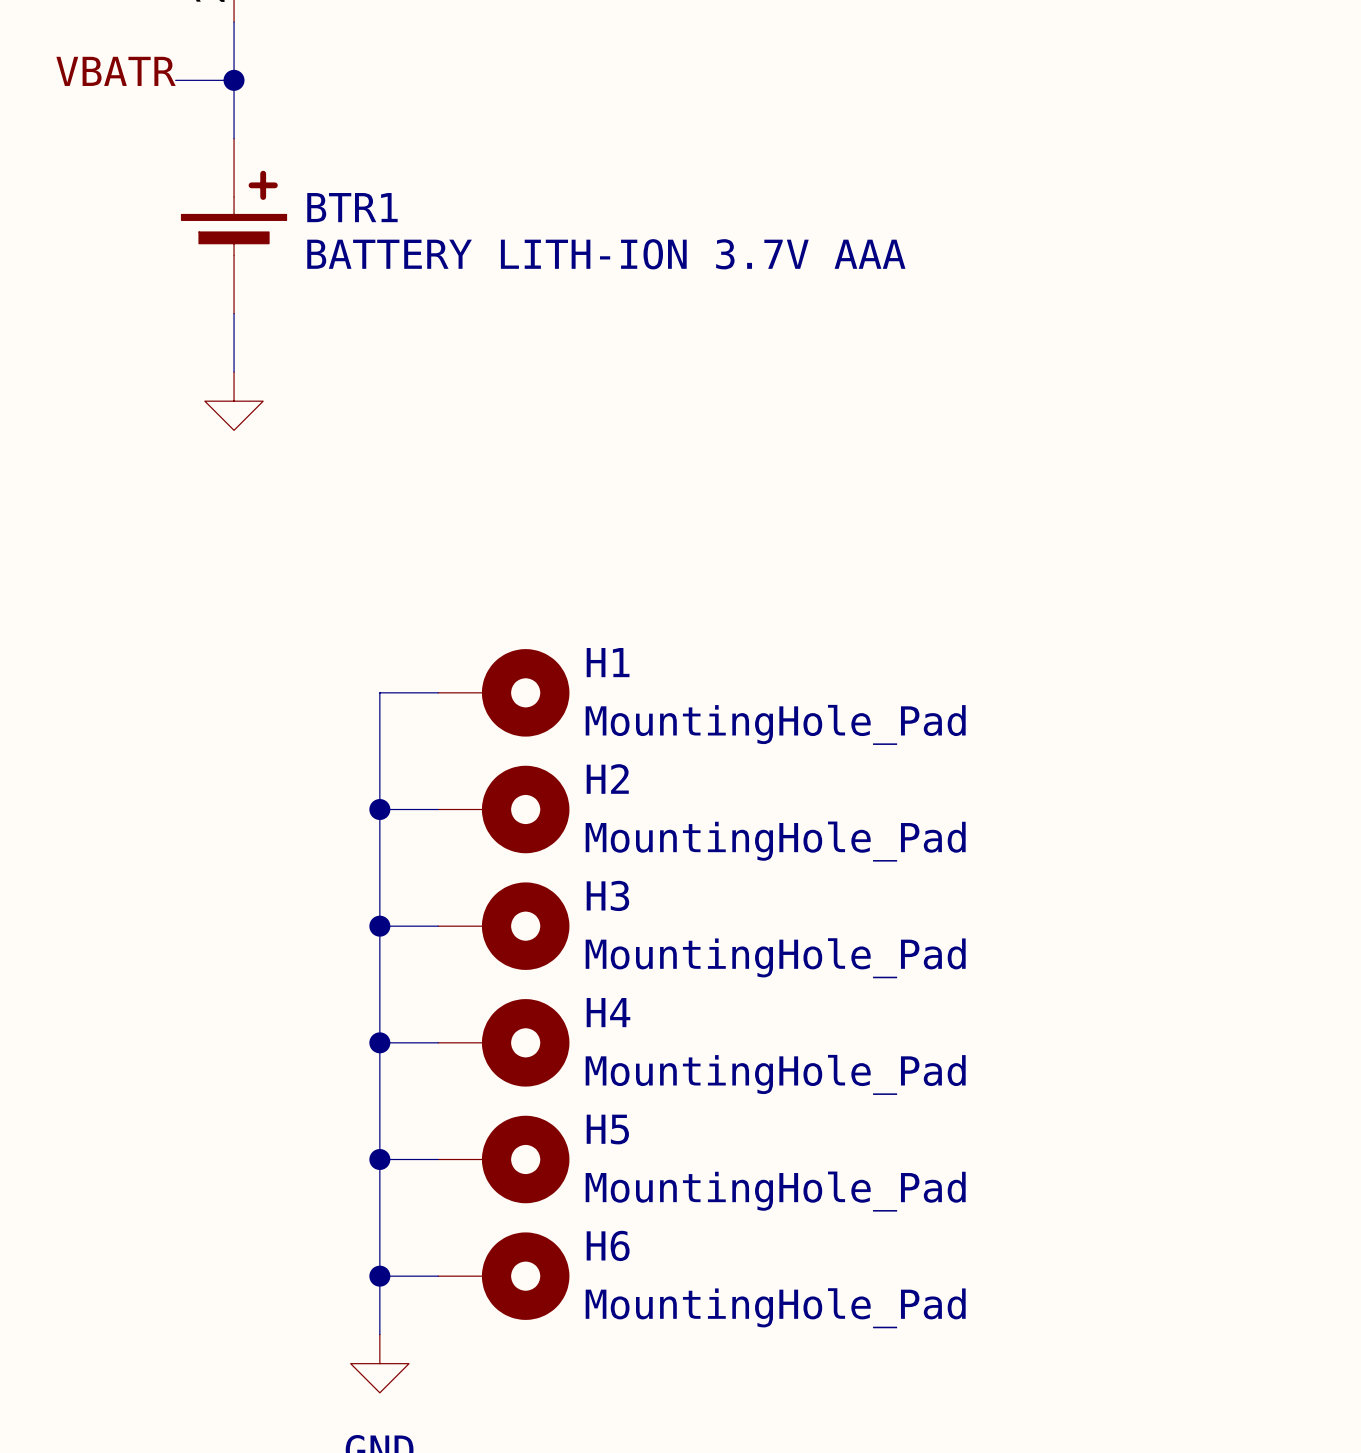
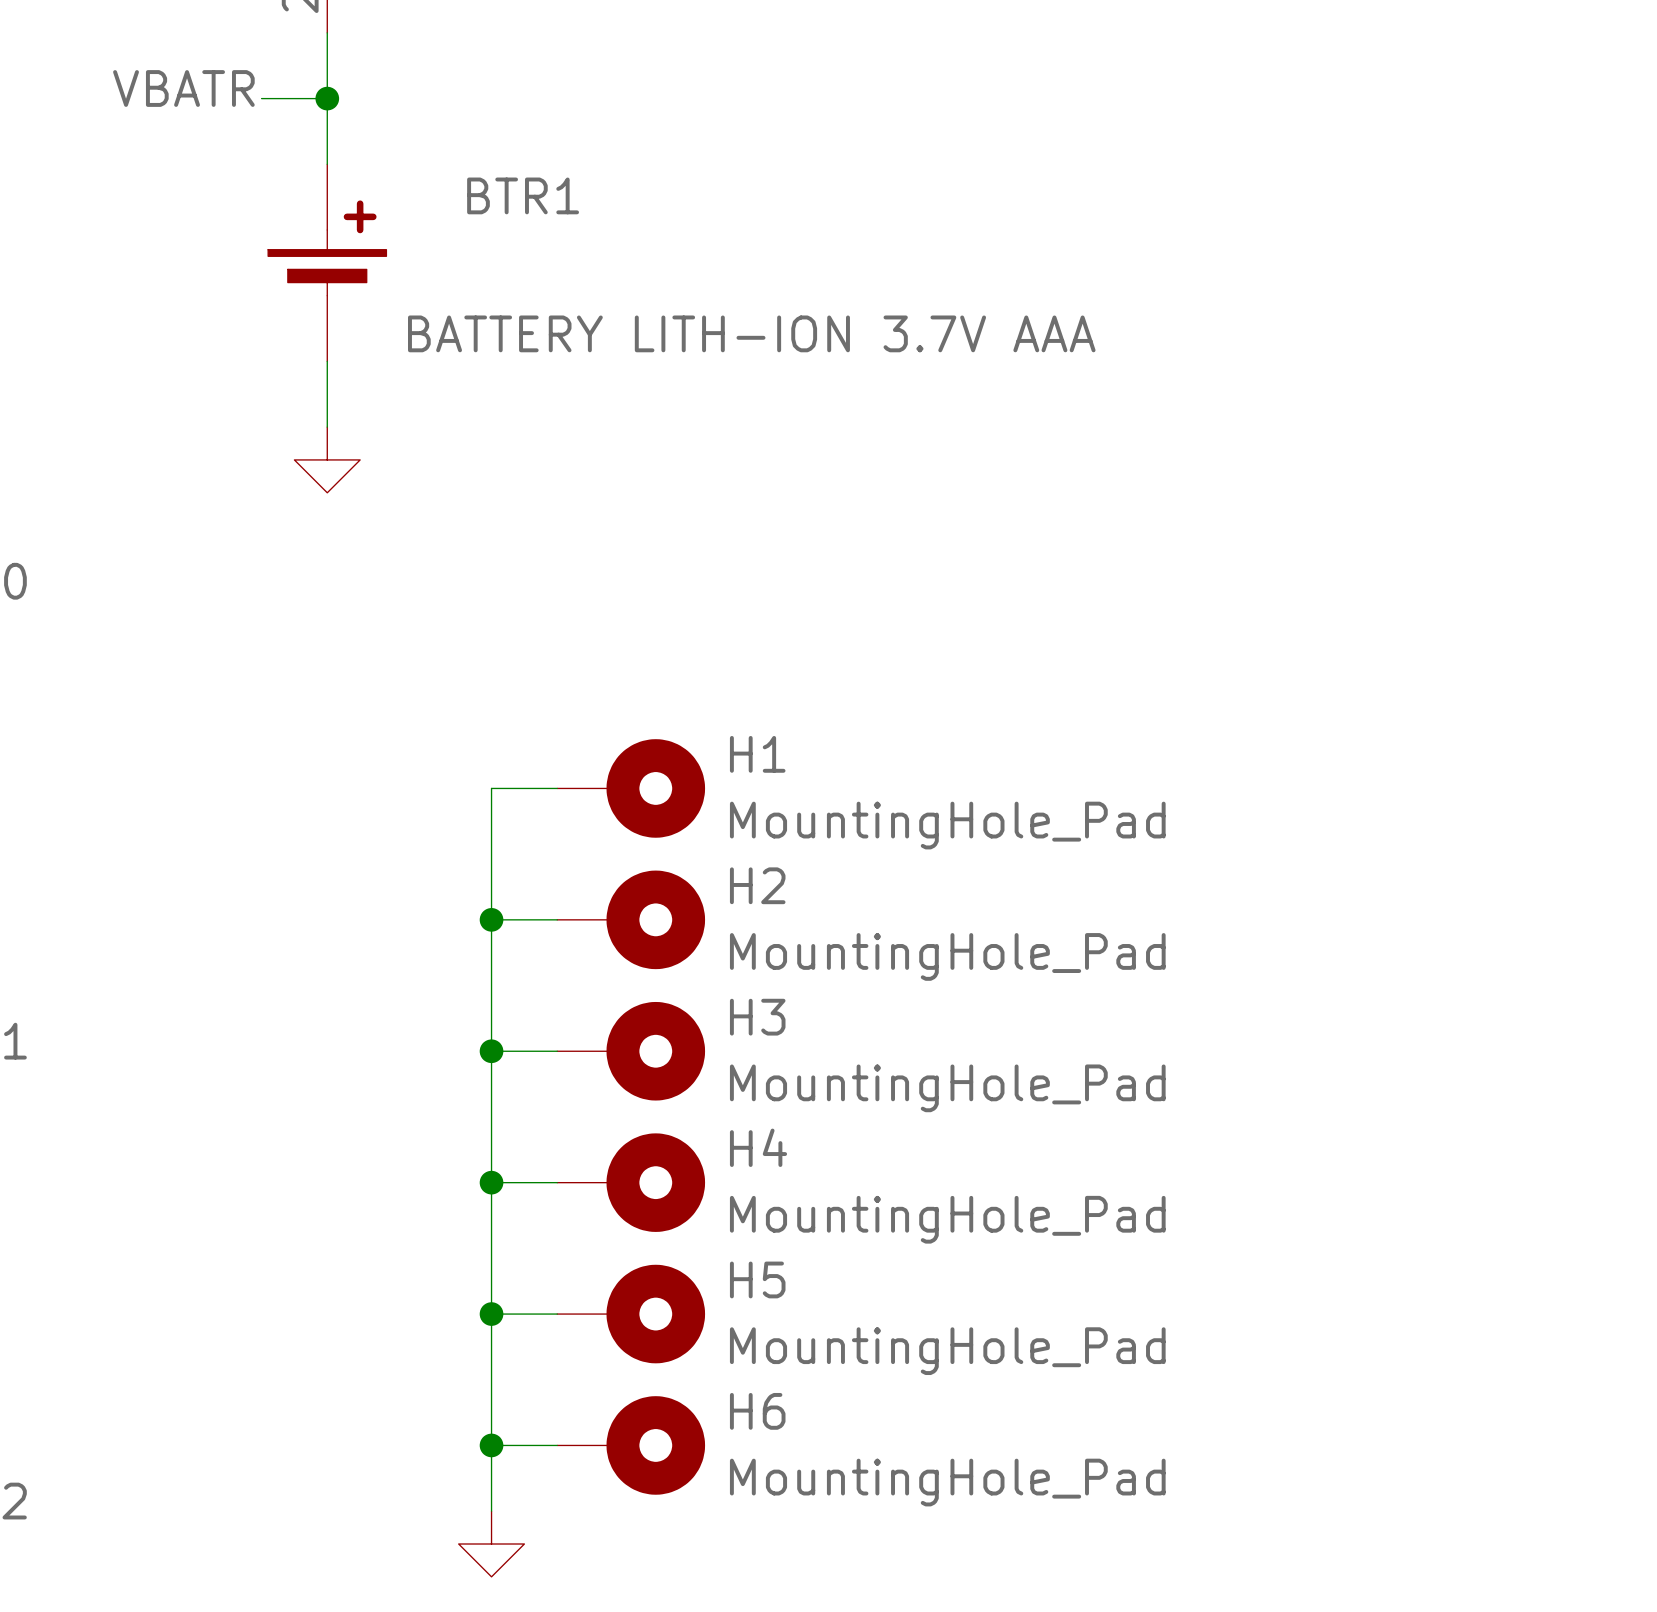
BTR1 name position: BTR1 (352, 207) -> BTR1 (523, 195)
BTR1 value position: BATTERY LITH-ION 3.7V AAA (606, 254) -> BATTERY LITH-ION 3.7V AAA (751, 333)

